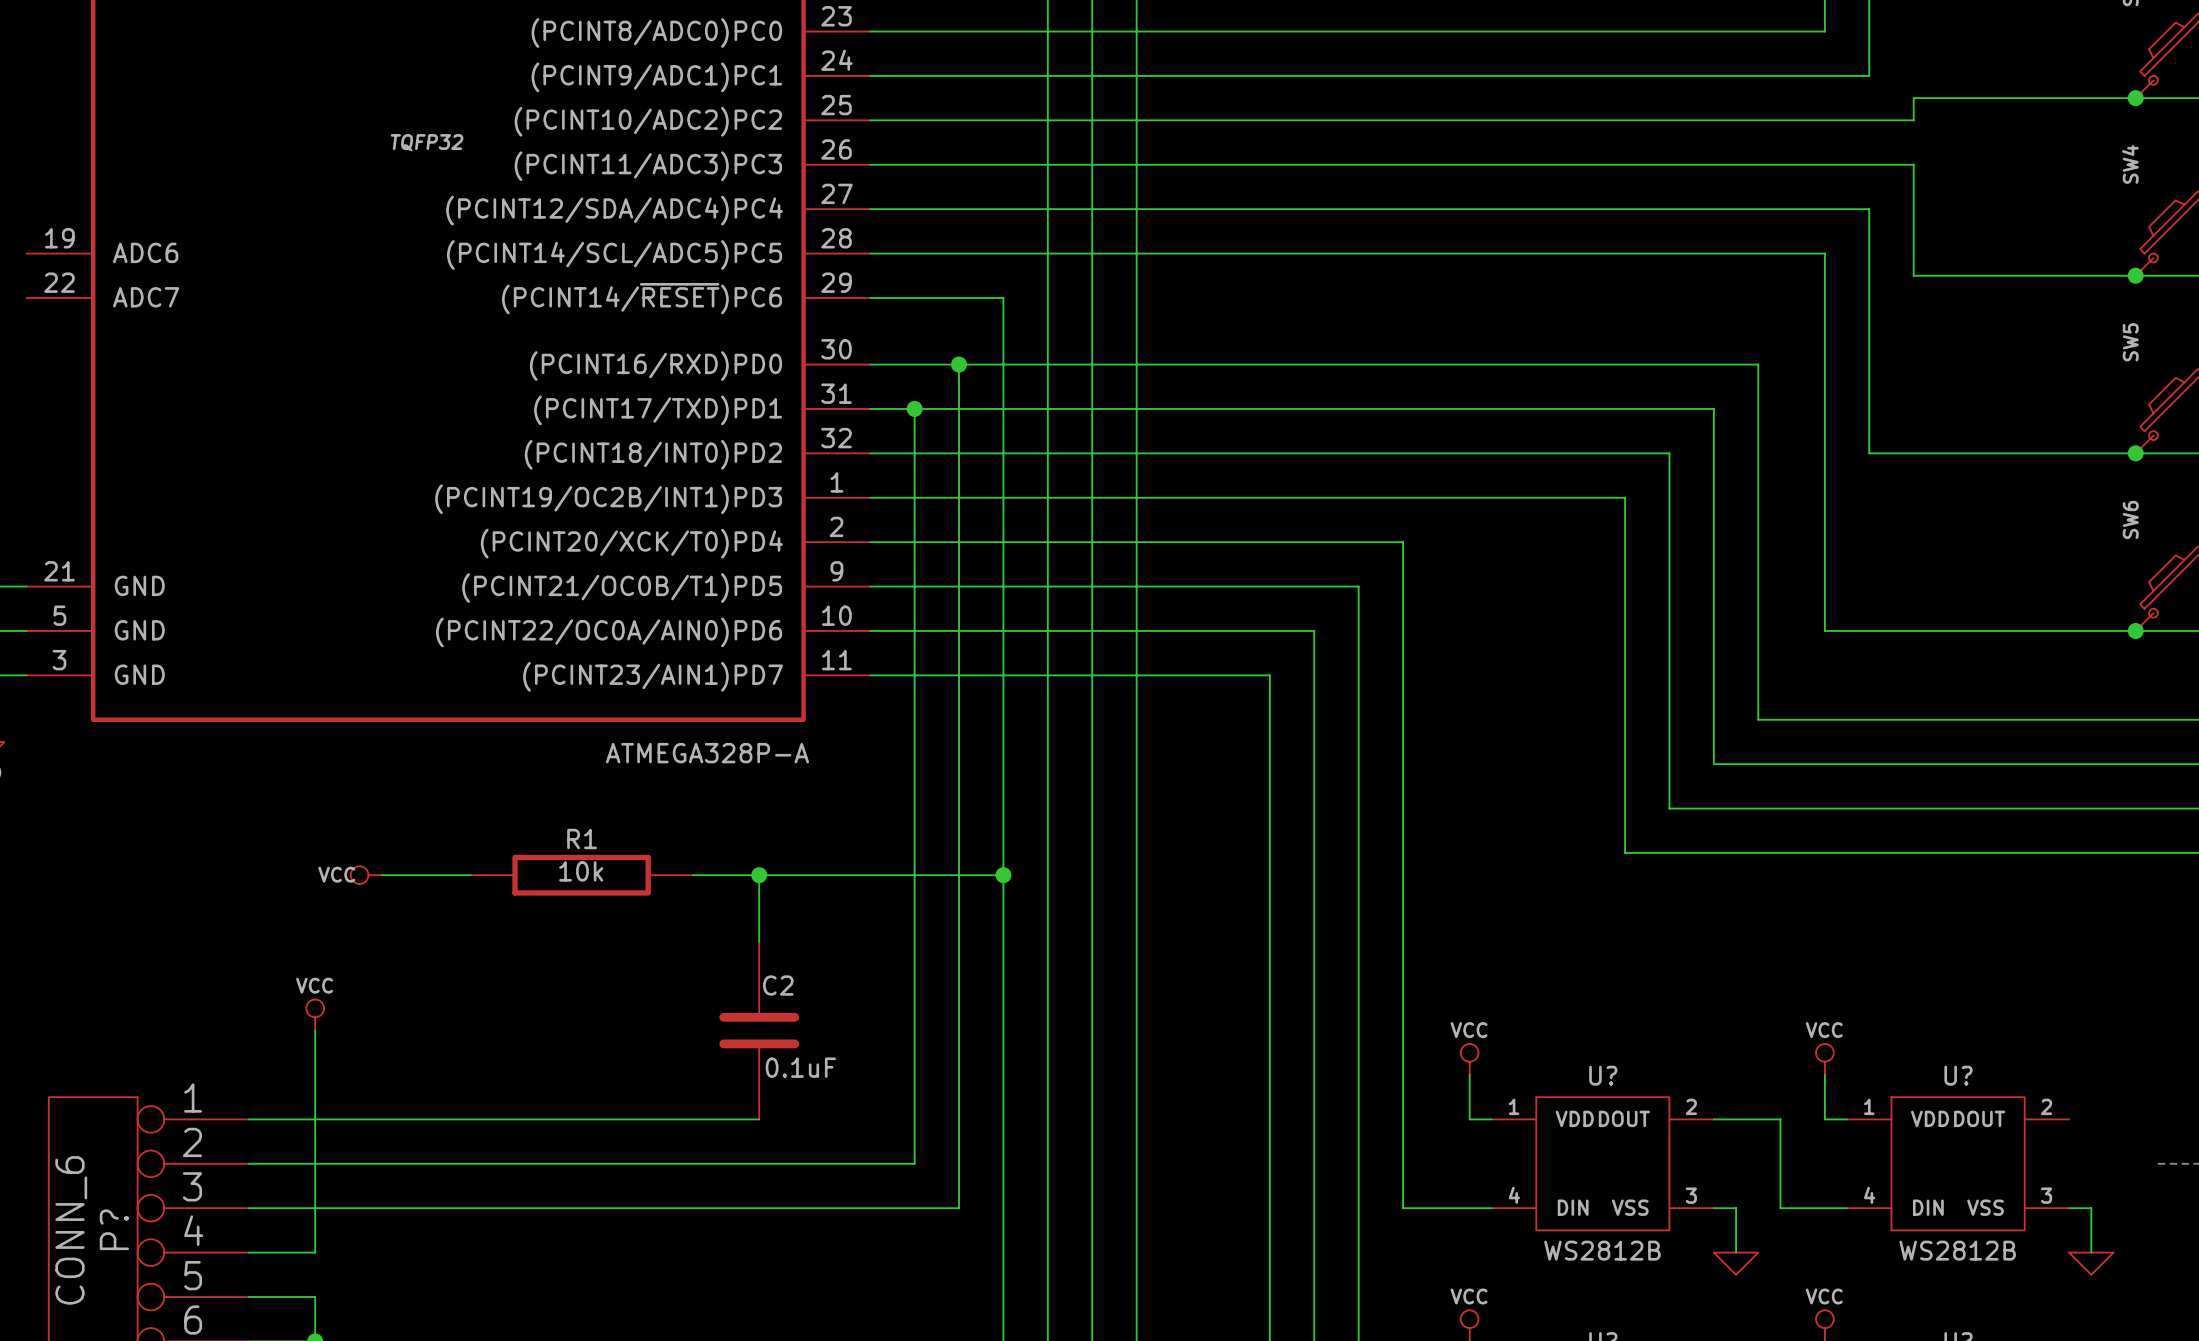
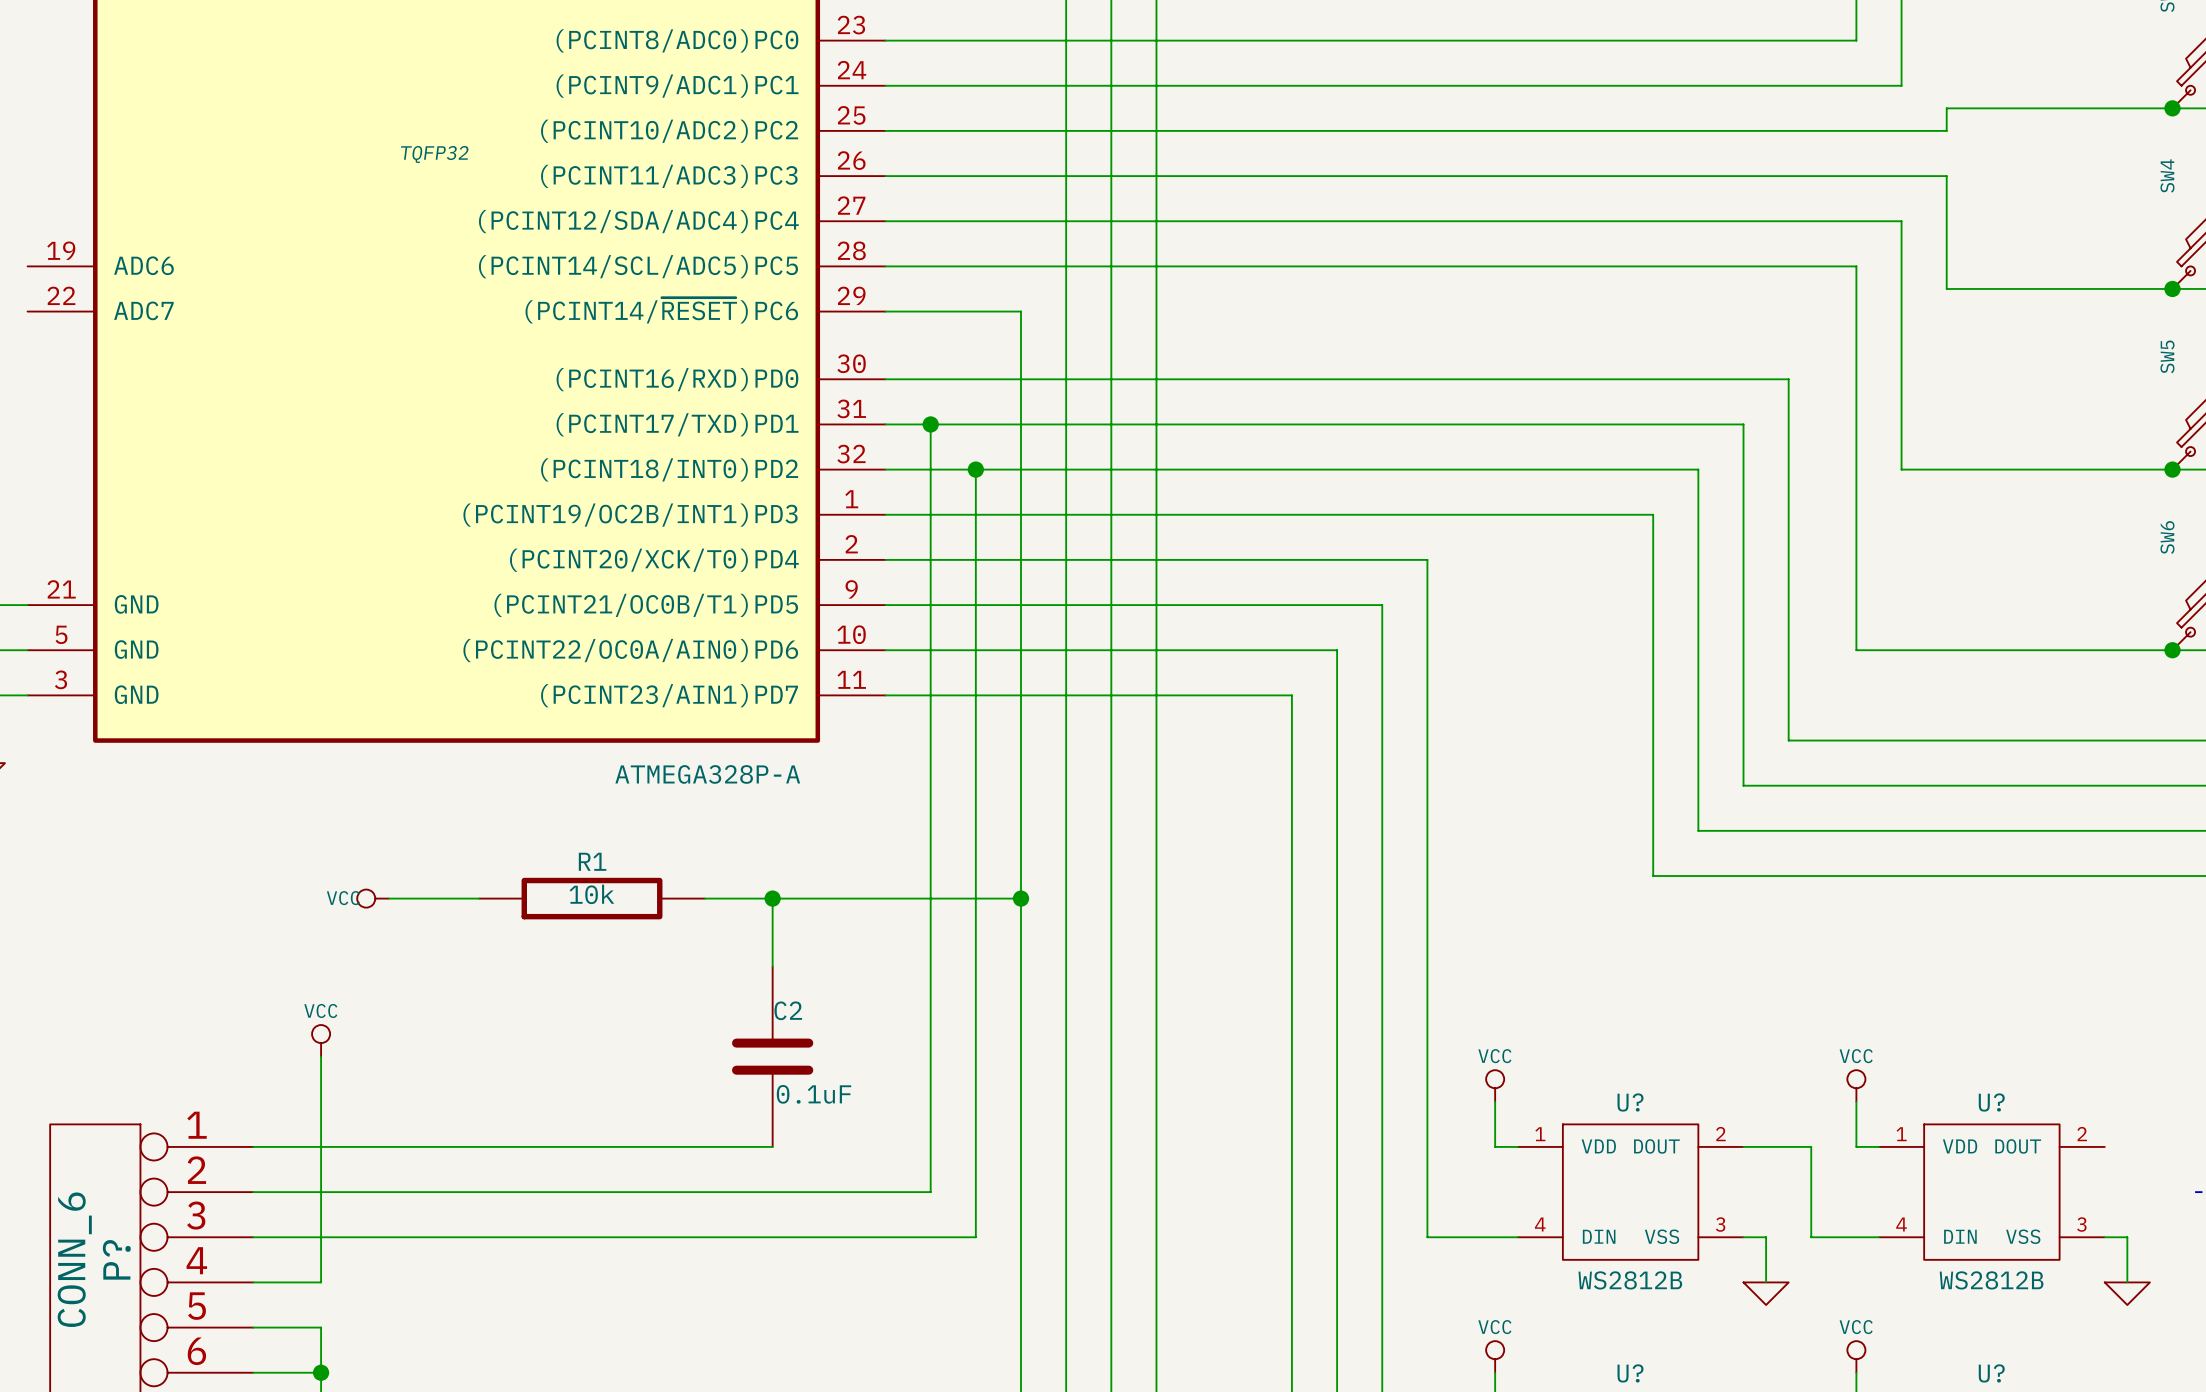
wire: (959, 364) (959, 453) -> none
junction position: (959, 364) -> (975, 469)

